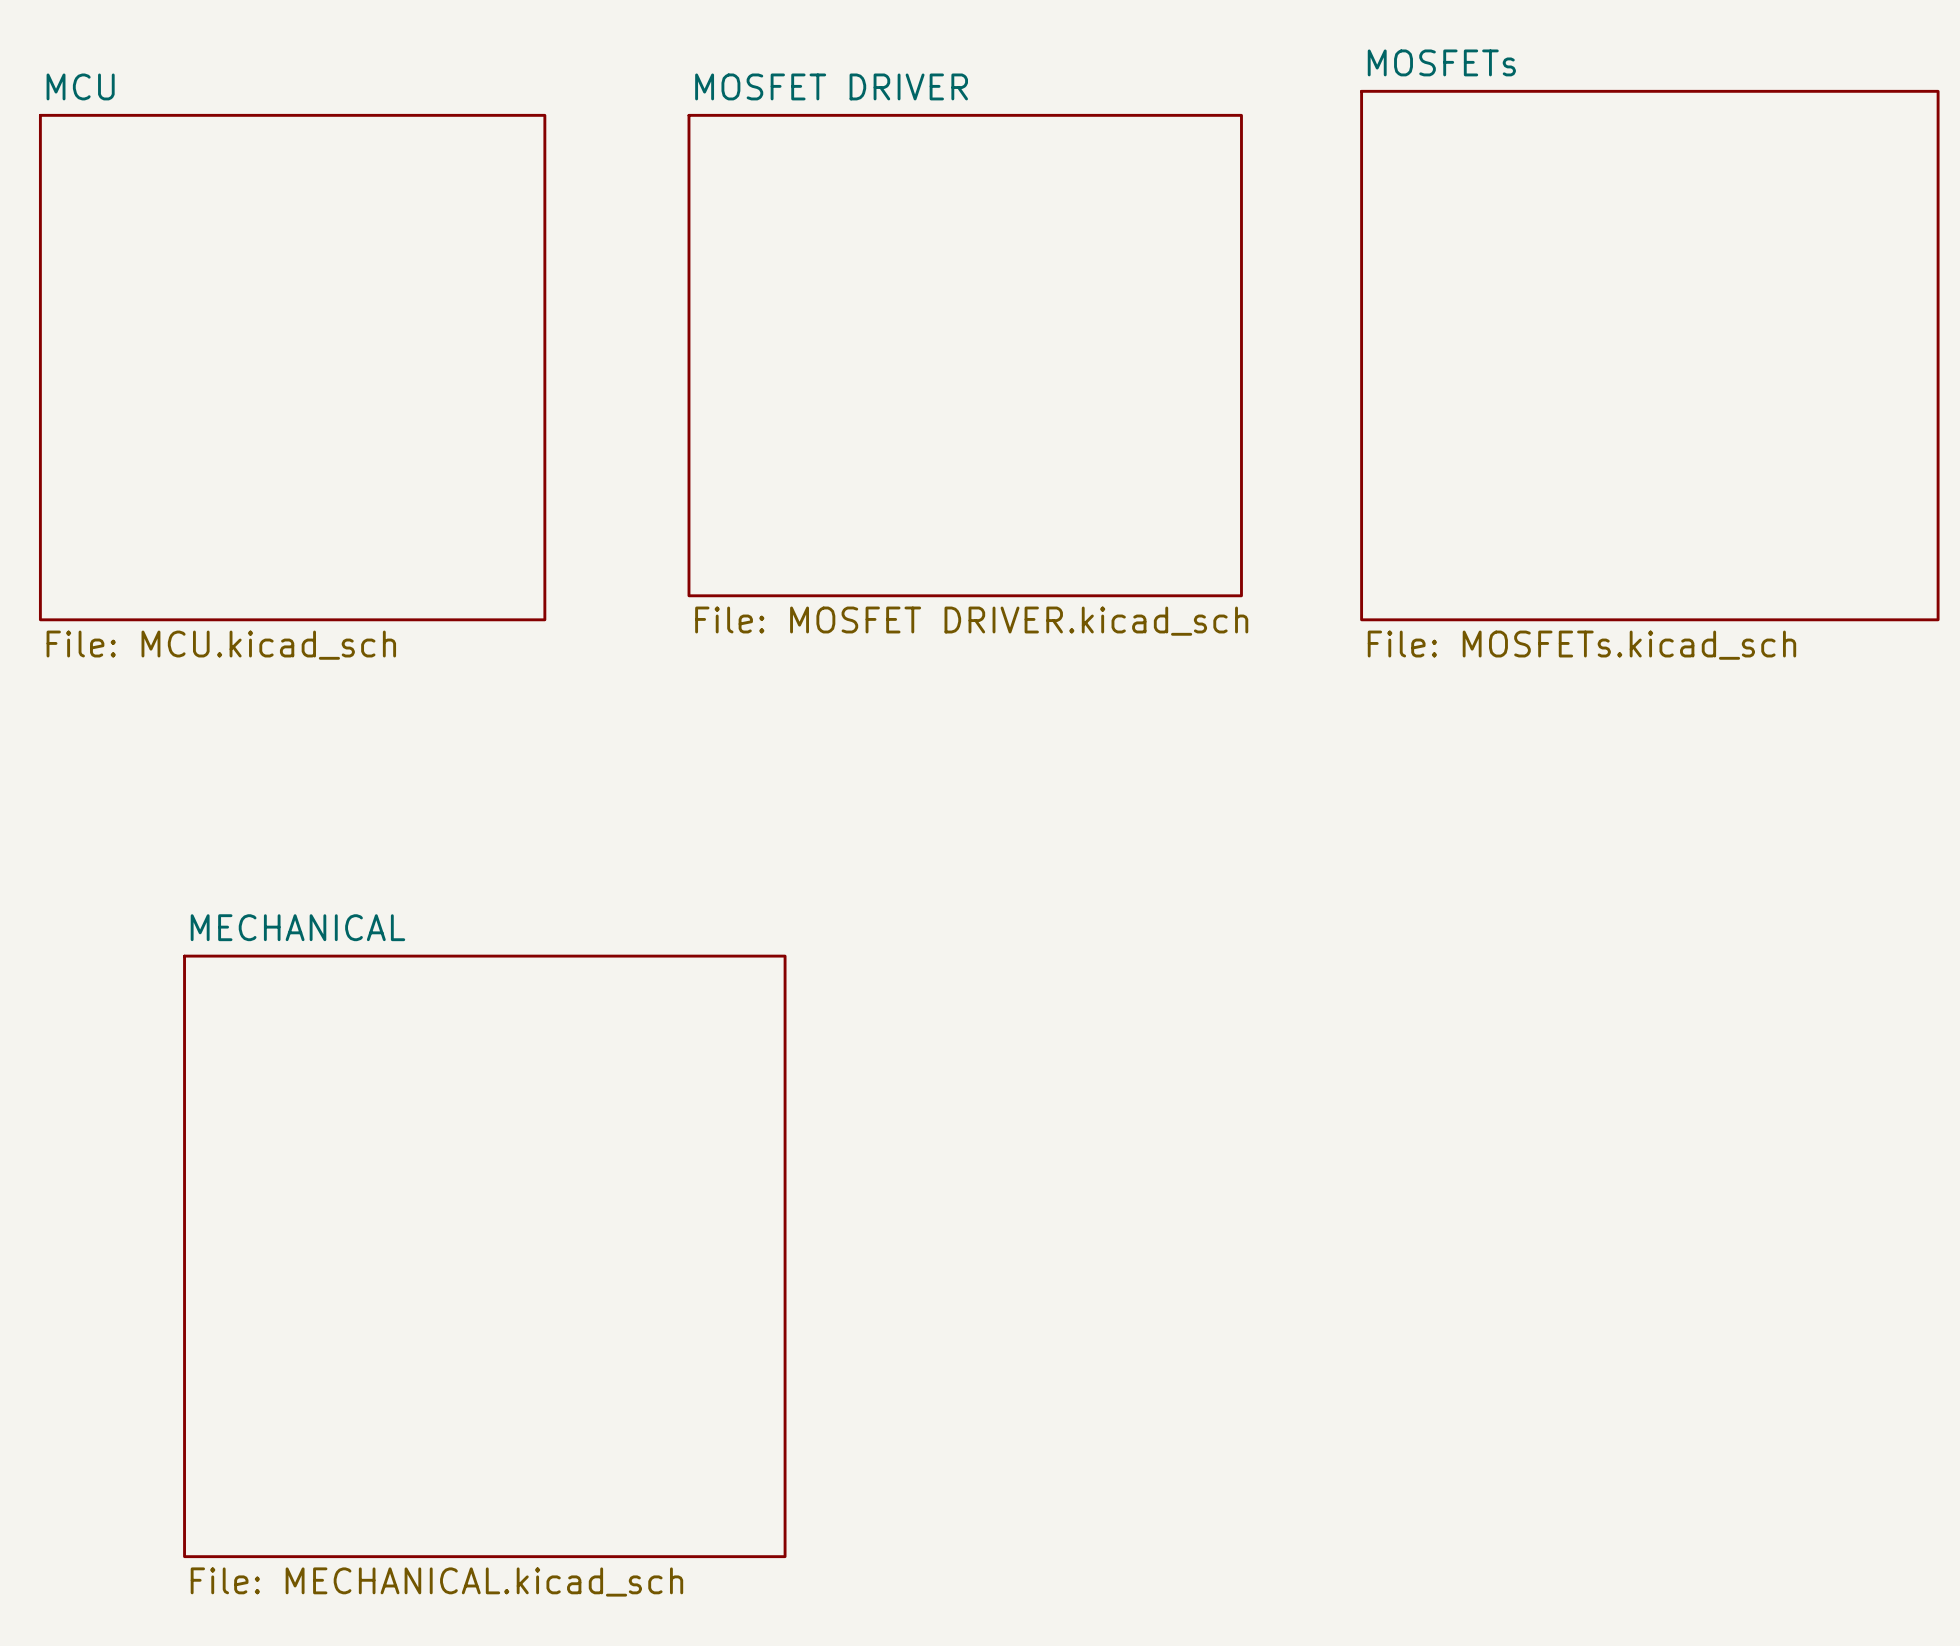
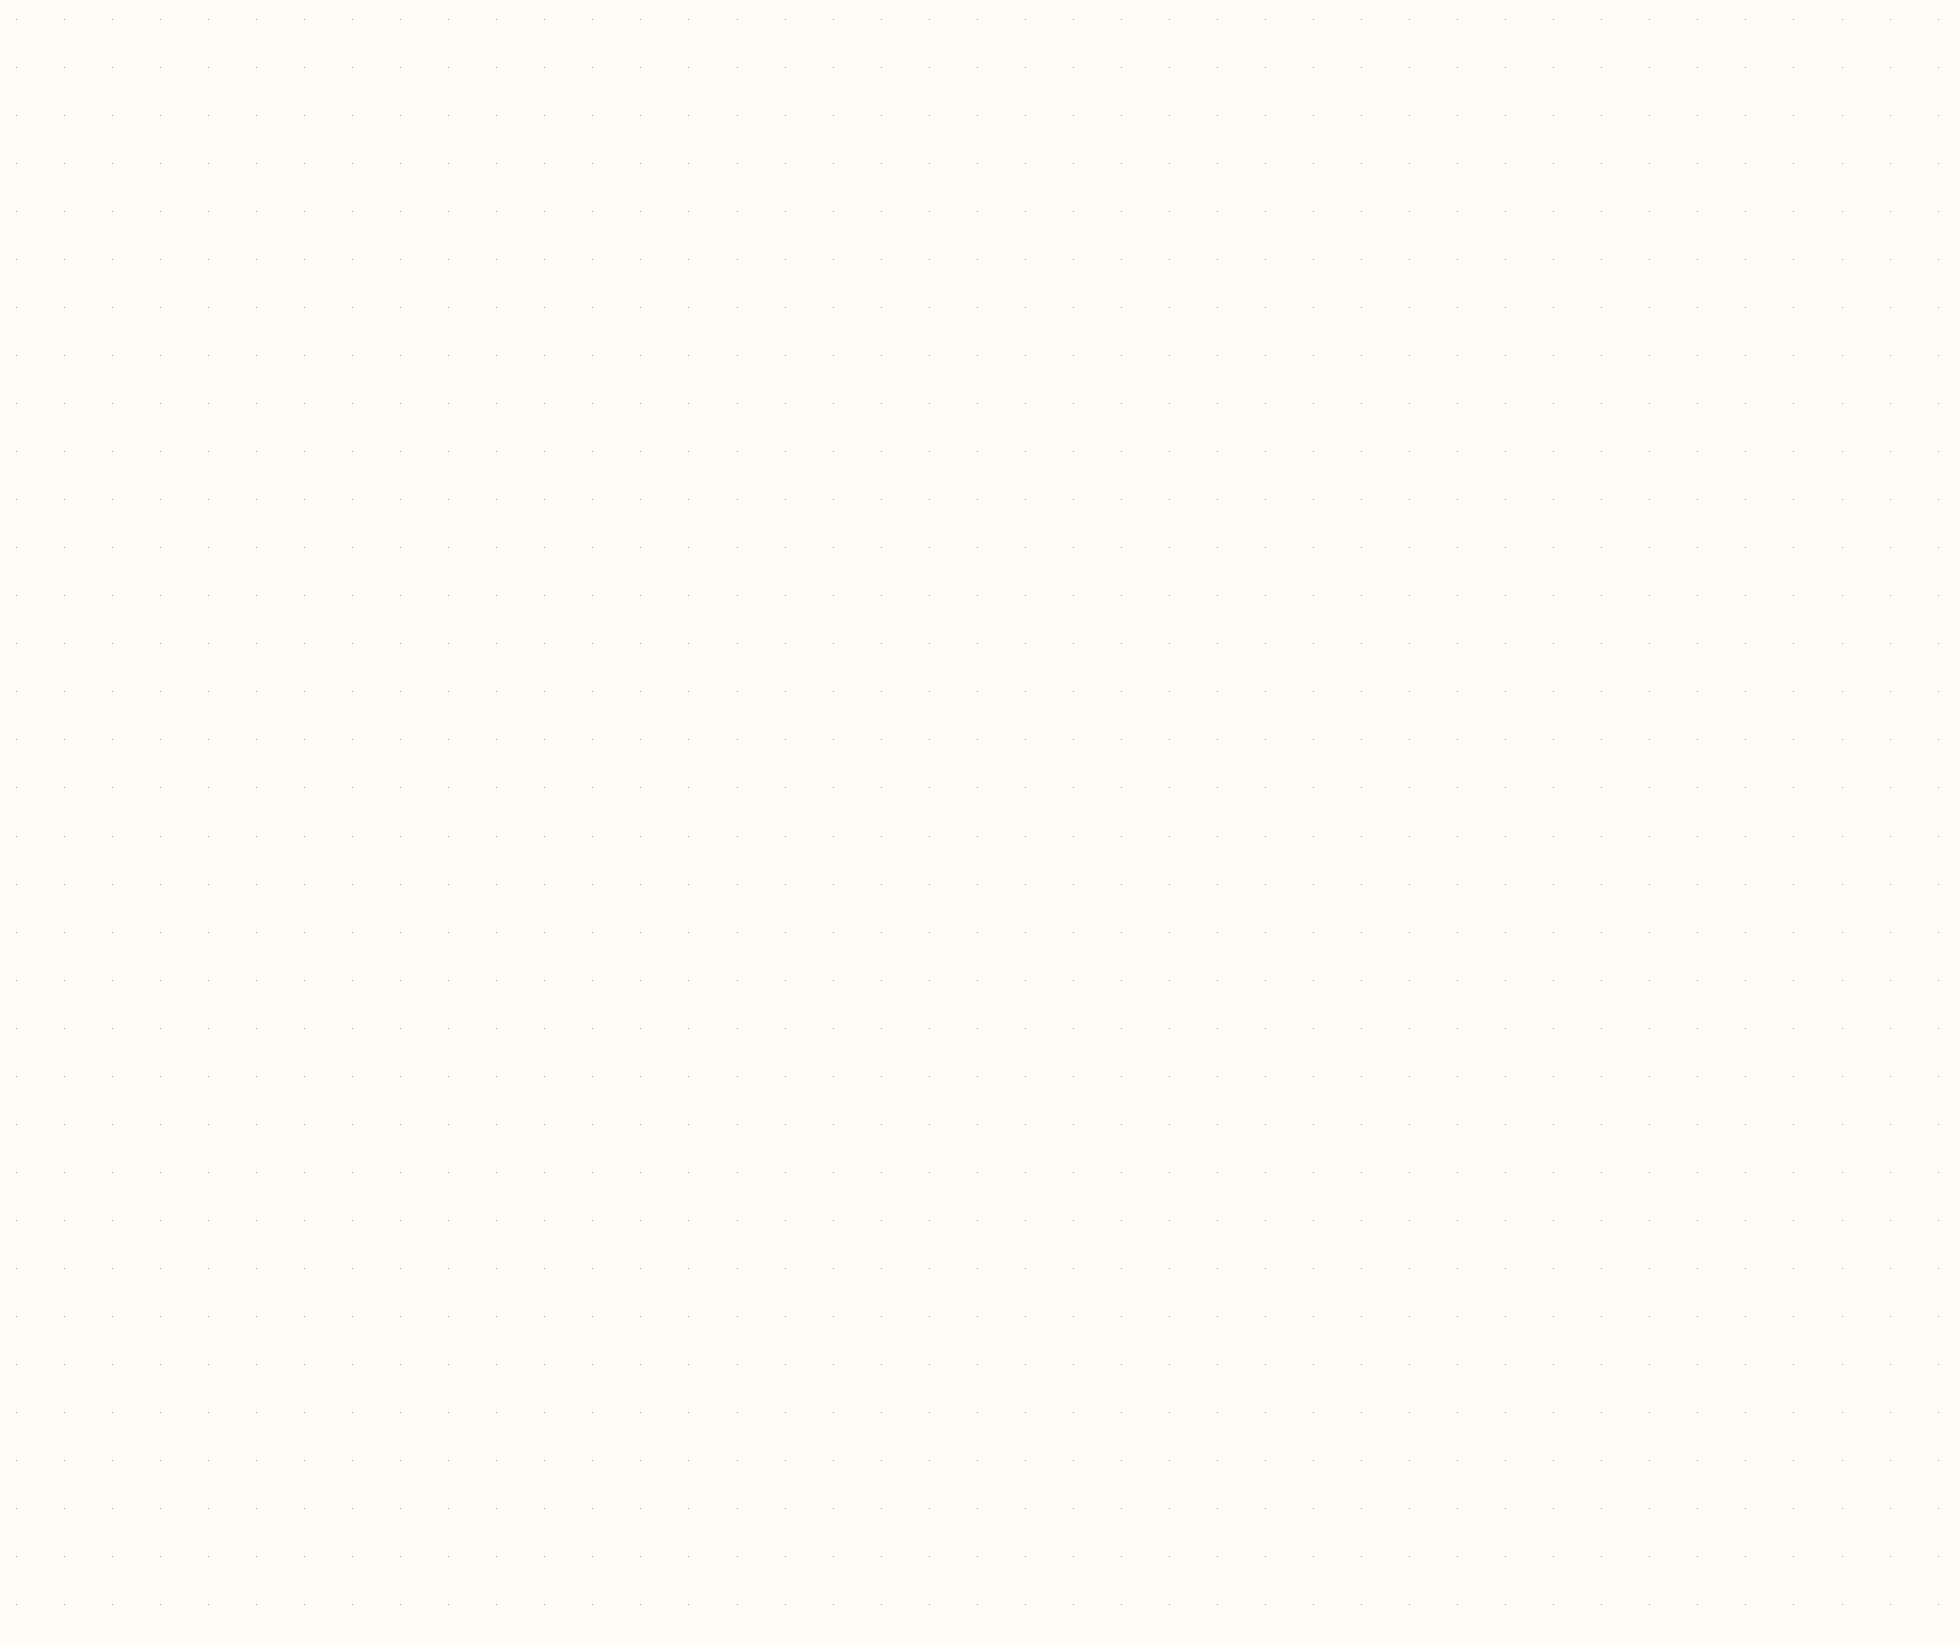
sheet MOSFET DRIVER: File: MOSFET DRIVER.kicad_sch (965, 355) -> none
sheet MOSFETs: File: MOSFETs.kicad_sch (1649, 355) -> none
sheet MCU: File: MCU.kicad_sch (292, 367) -> none
sheet MECHANICAL: File: MECHANICAL.kicad_sch (484, 1256) -> none

